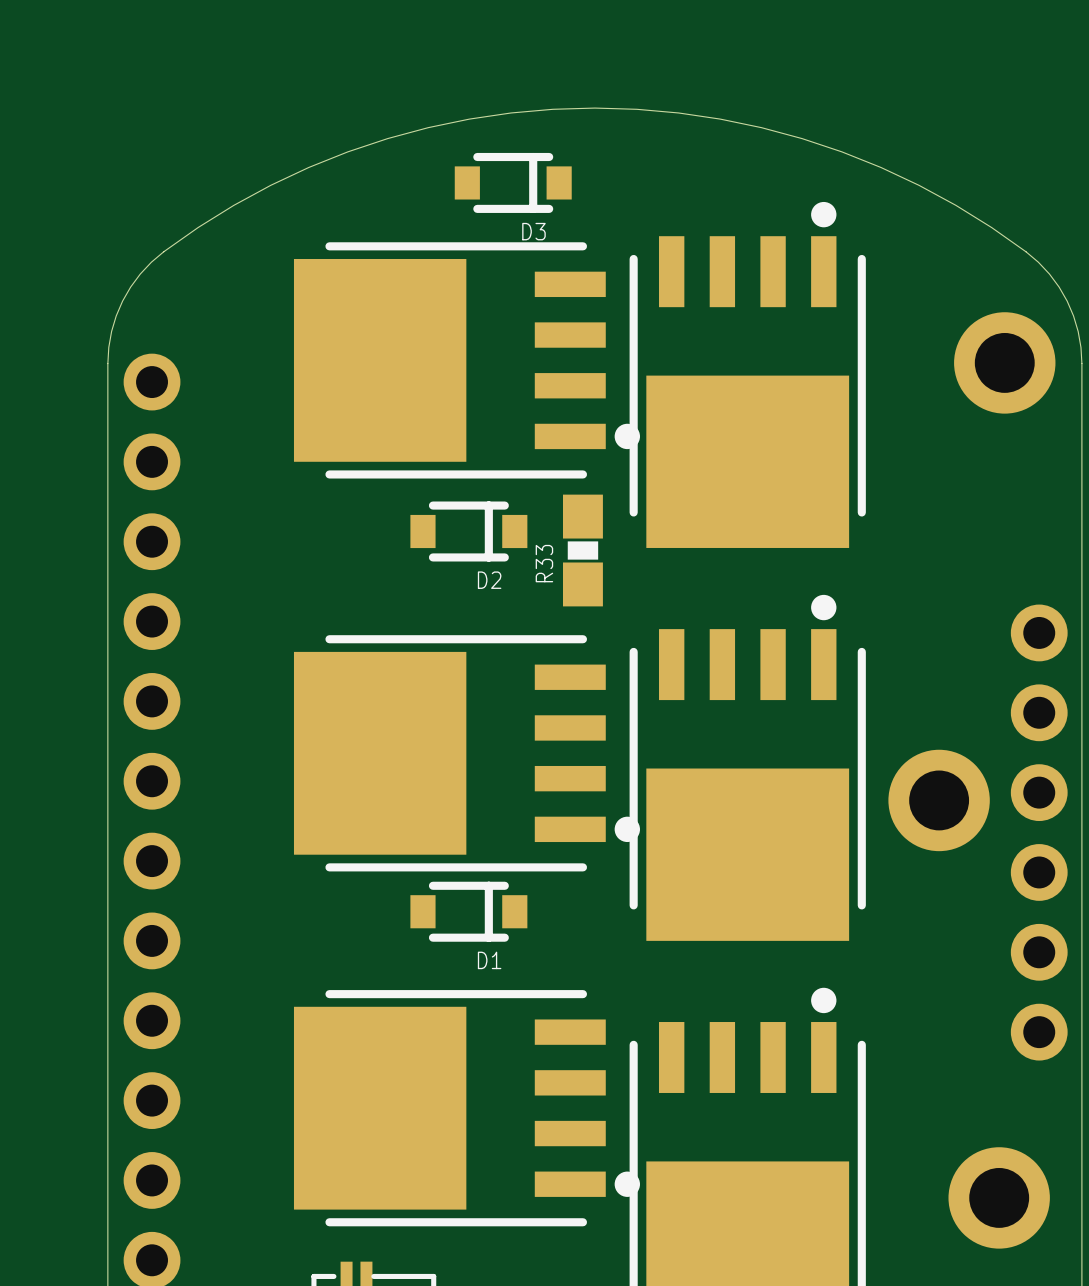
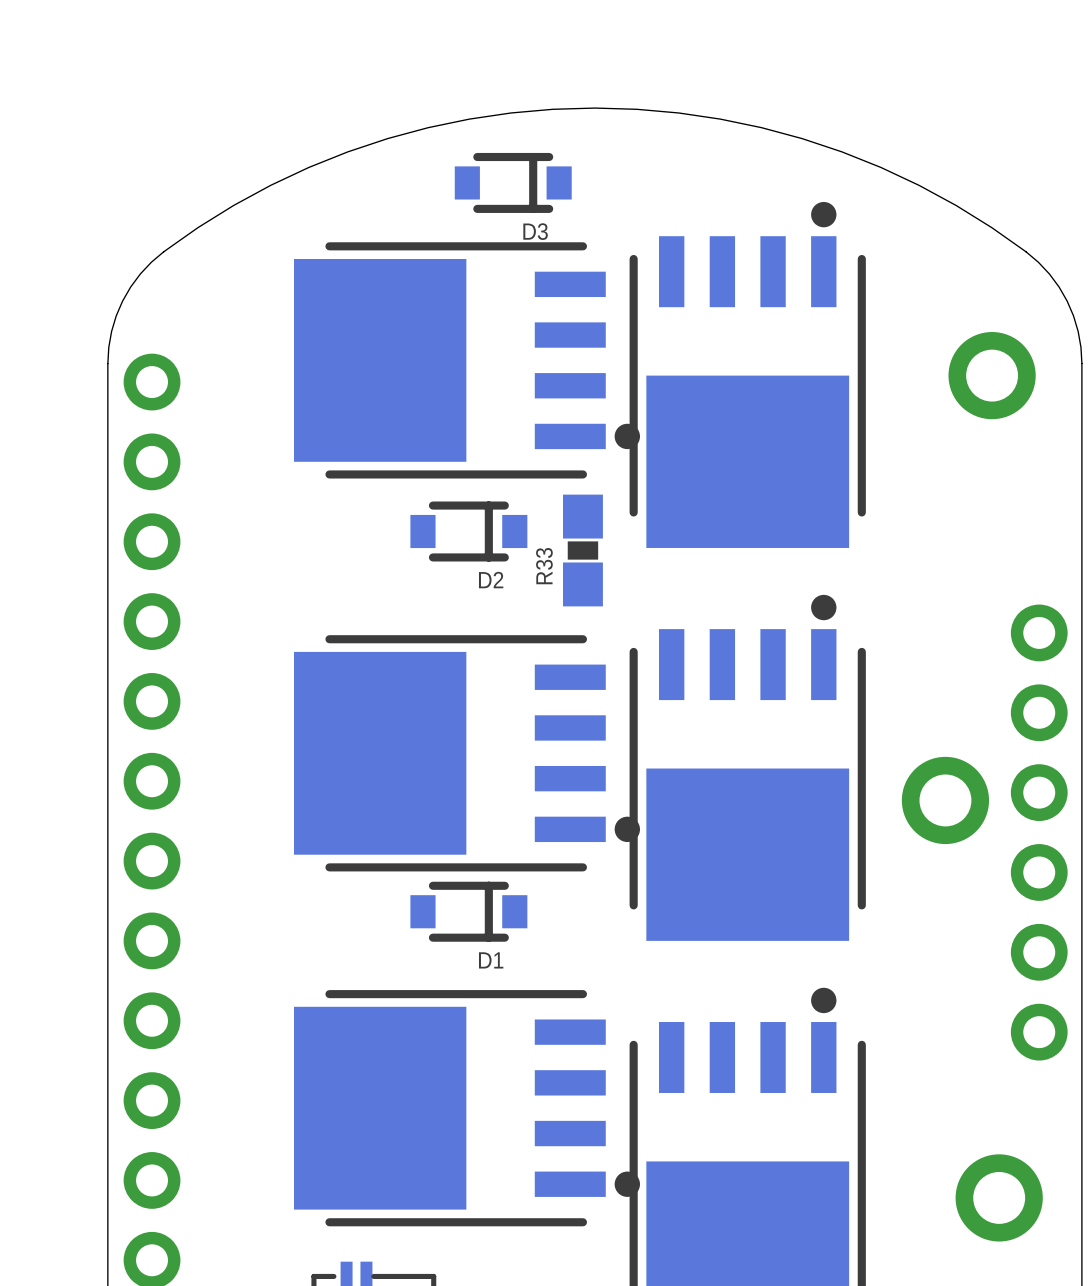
part footprint: [954, 312, 1056, 414] -> [948, 332, 1036, 420]
part footprint: [888, 749, 990, 852] -> [901, 756, 990, 845]
part footprint: [948, 1147, 1050, 1249] -> [955, 1154, 1043, 1242]

